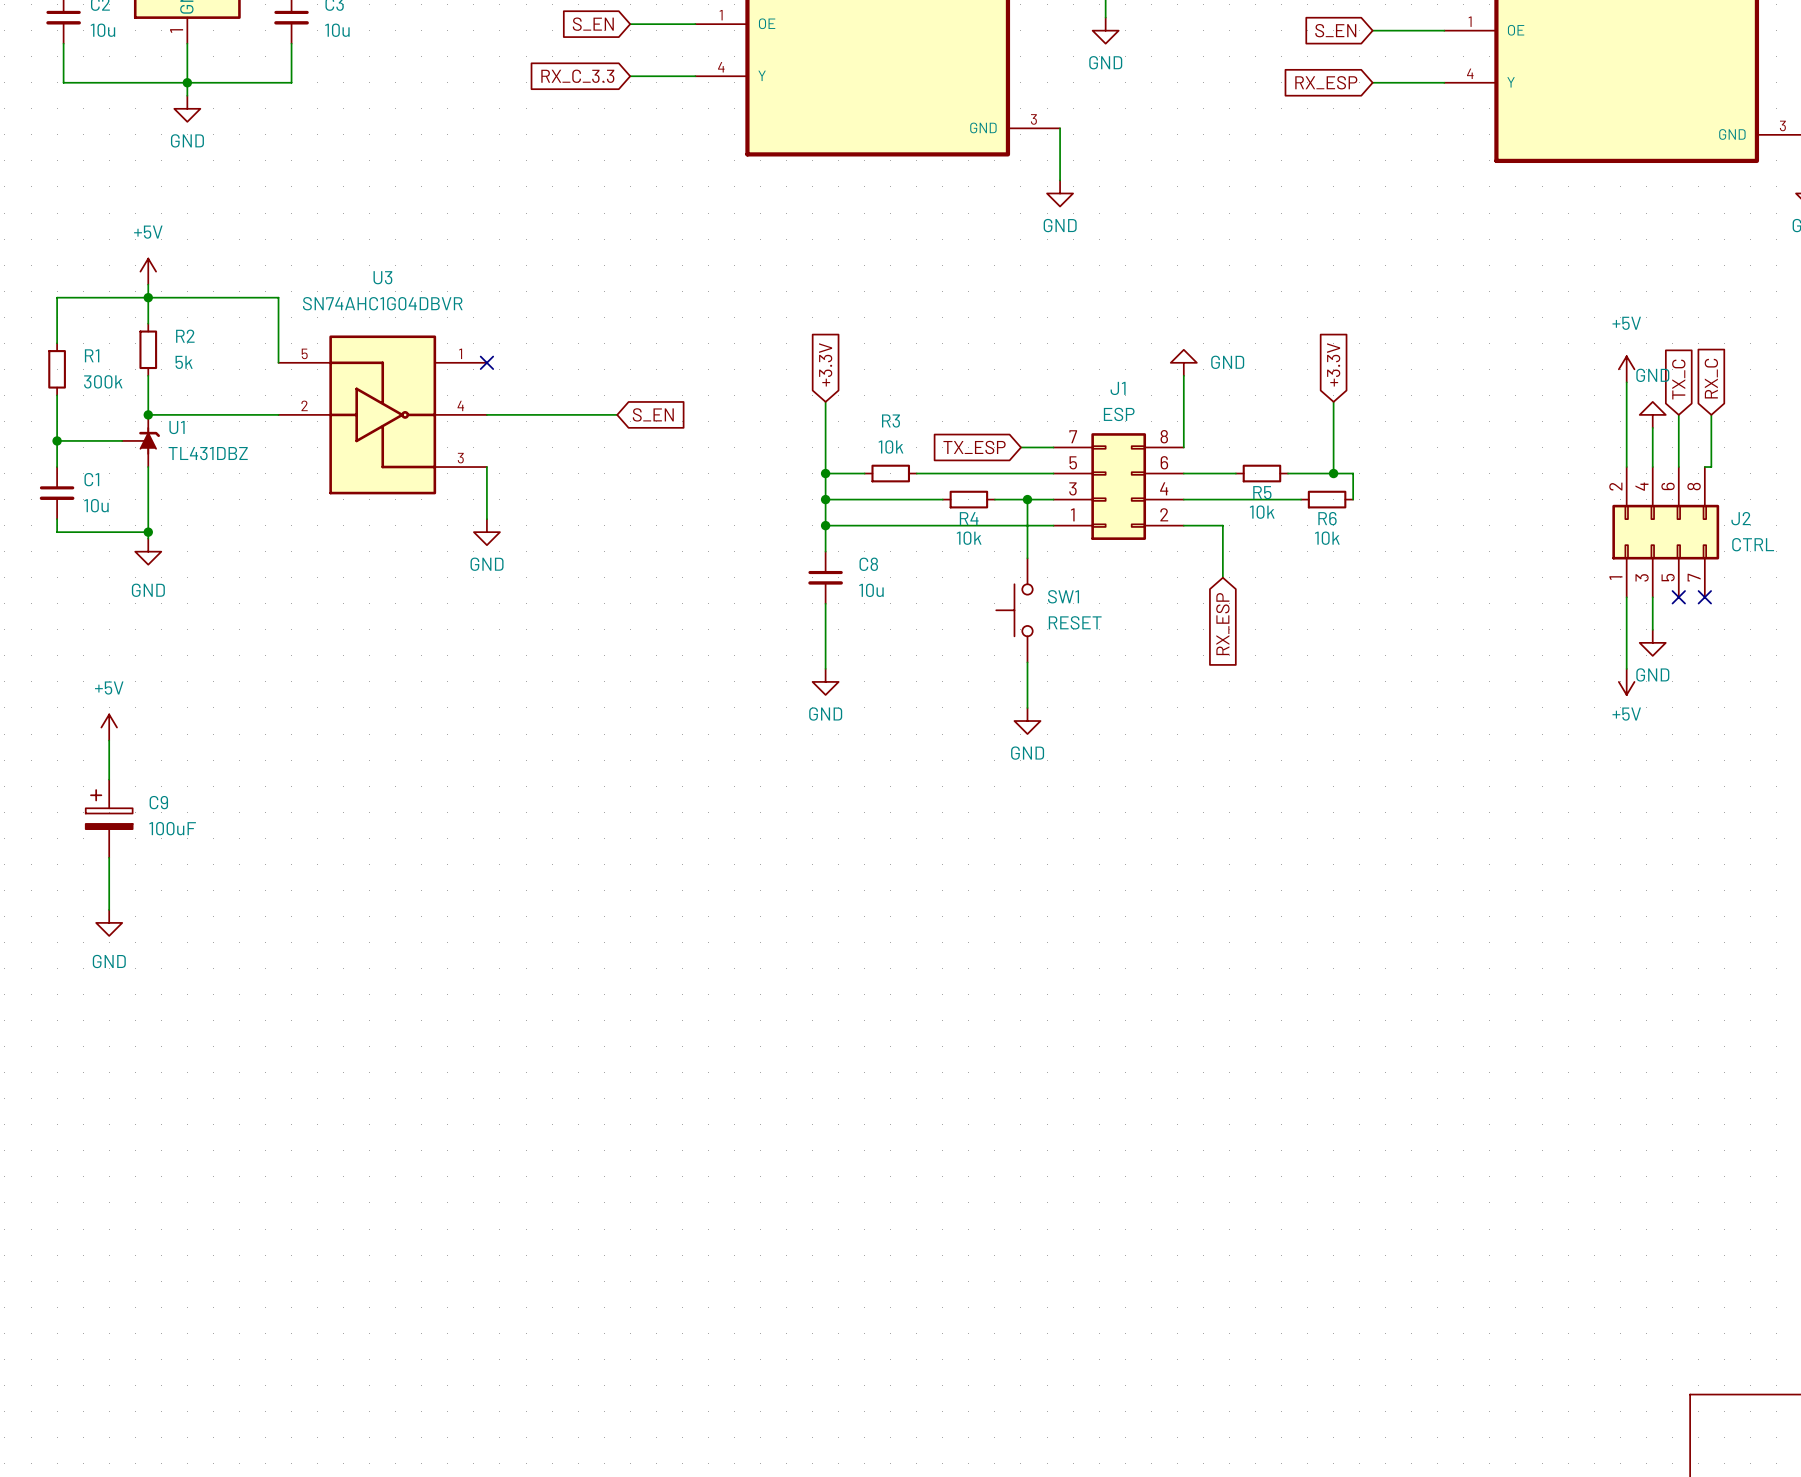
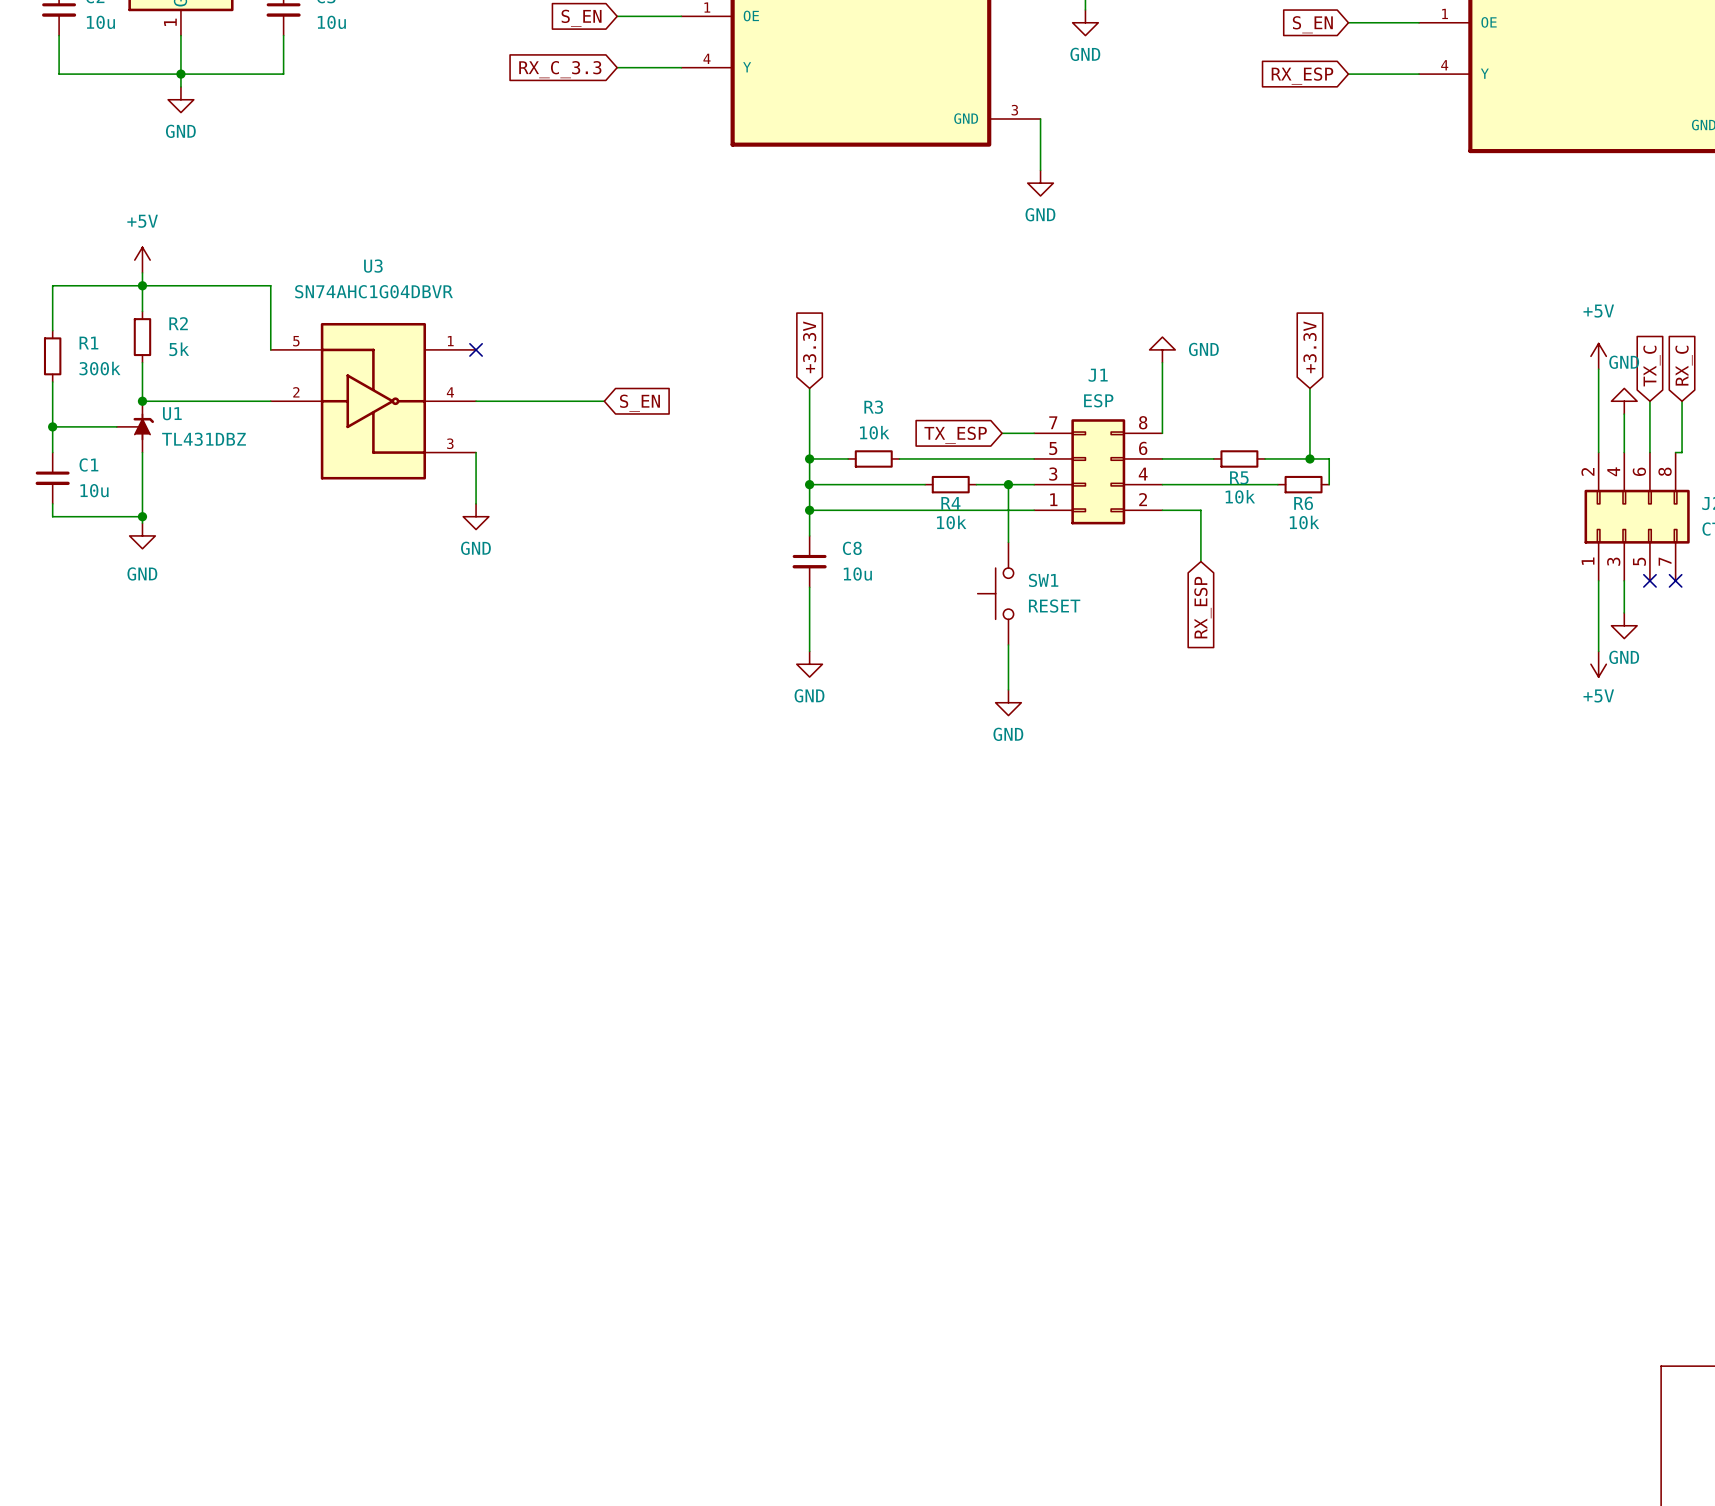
power symbol: +5V (109, 727) -> none
wire: (109, 740) (109, 779) -> none
C9: 100uF (109, 818) -> none
wire: (109, 857) (109, 909) -> none
power symbol: GND (109, 922) -> none

